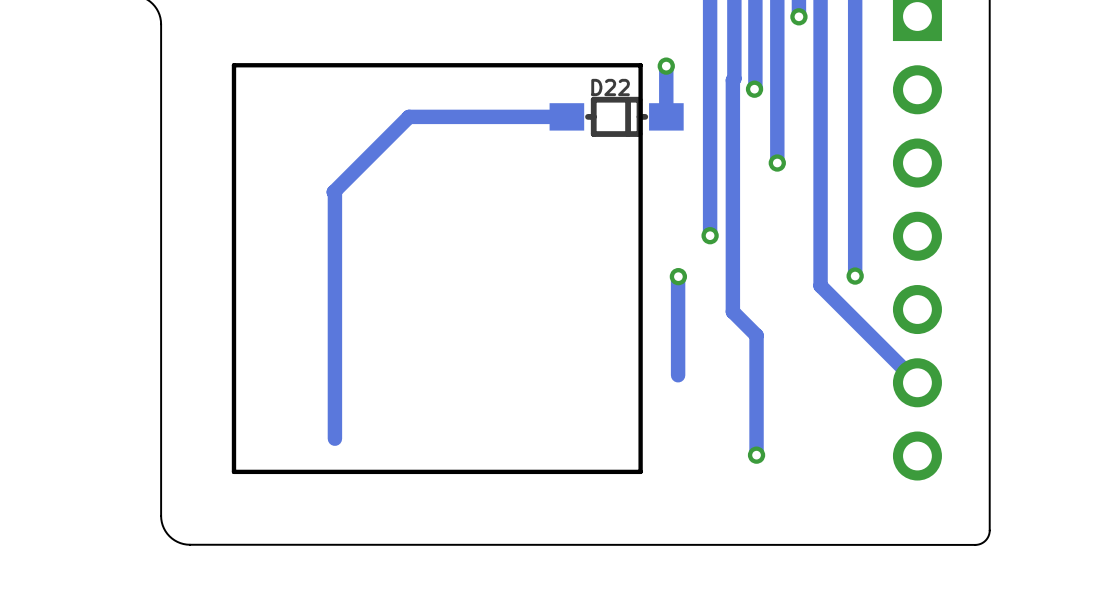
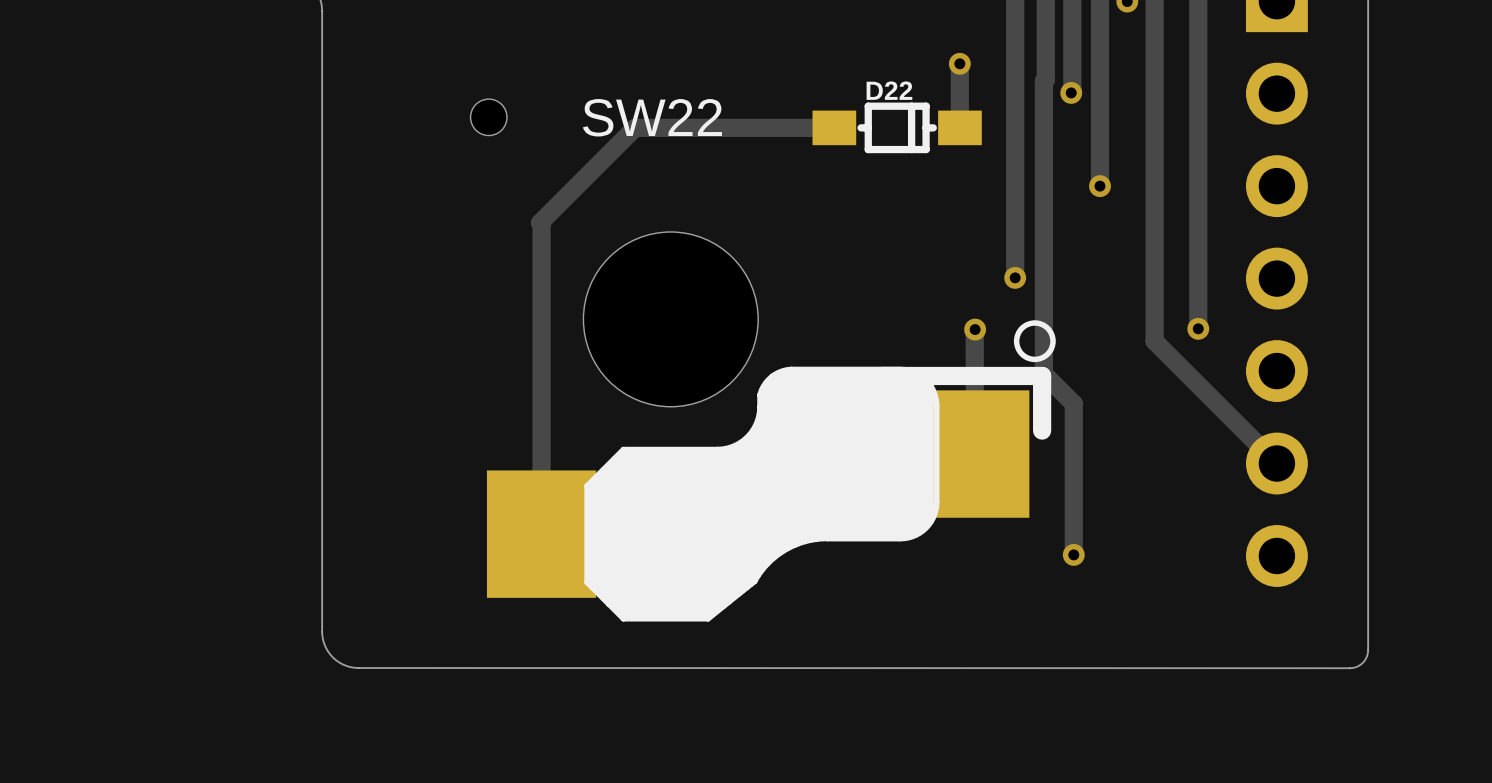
drawing: [231, 63, 643, 475] -> none
SW22: none -> (763, 360)

